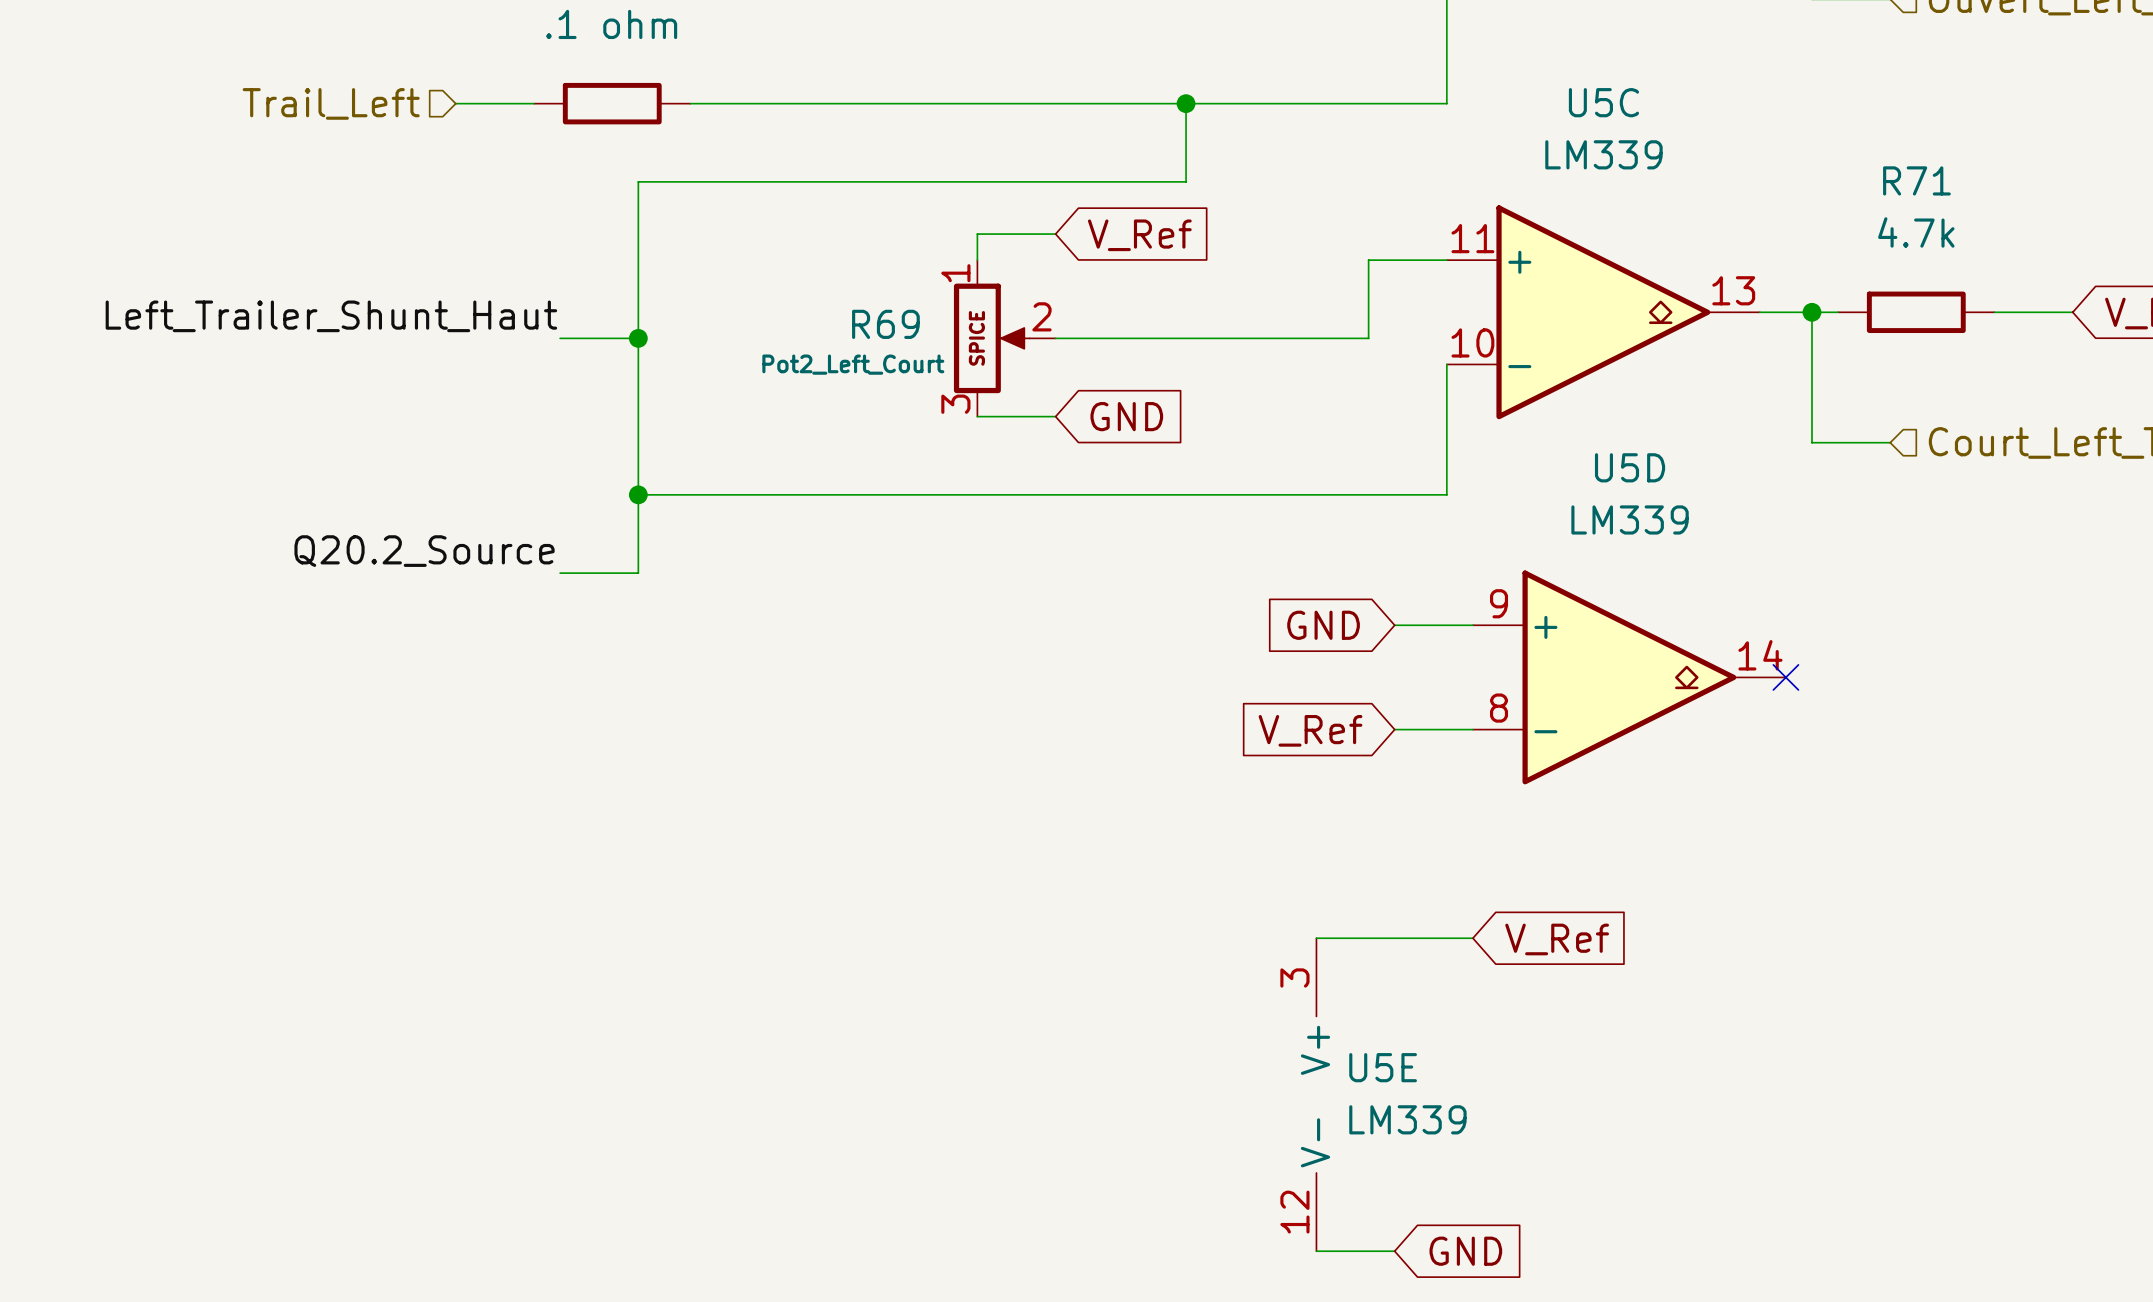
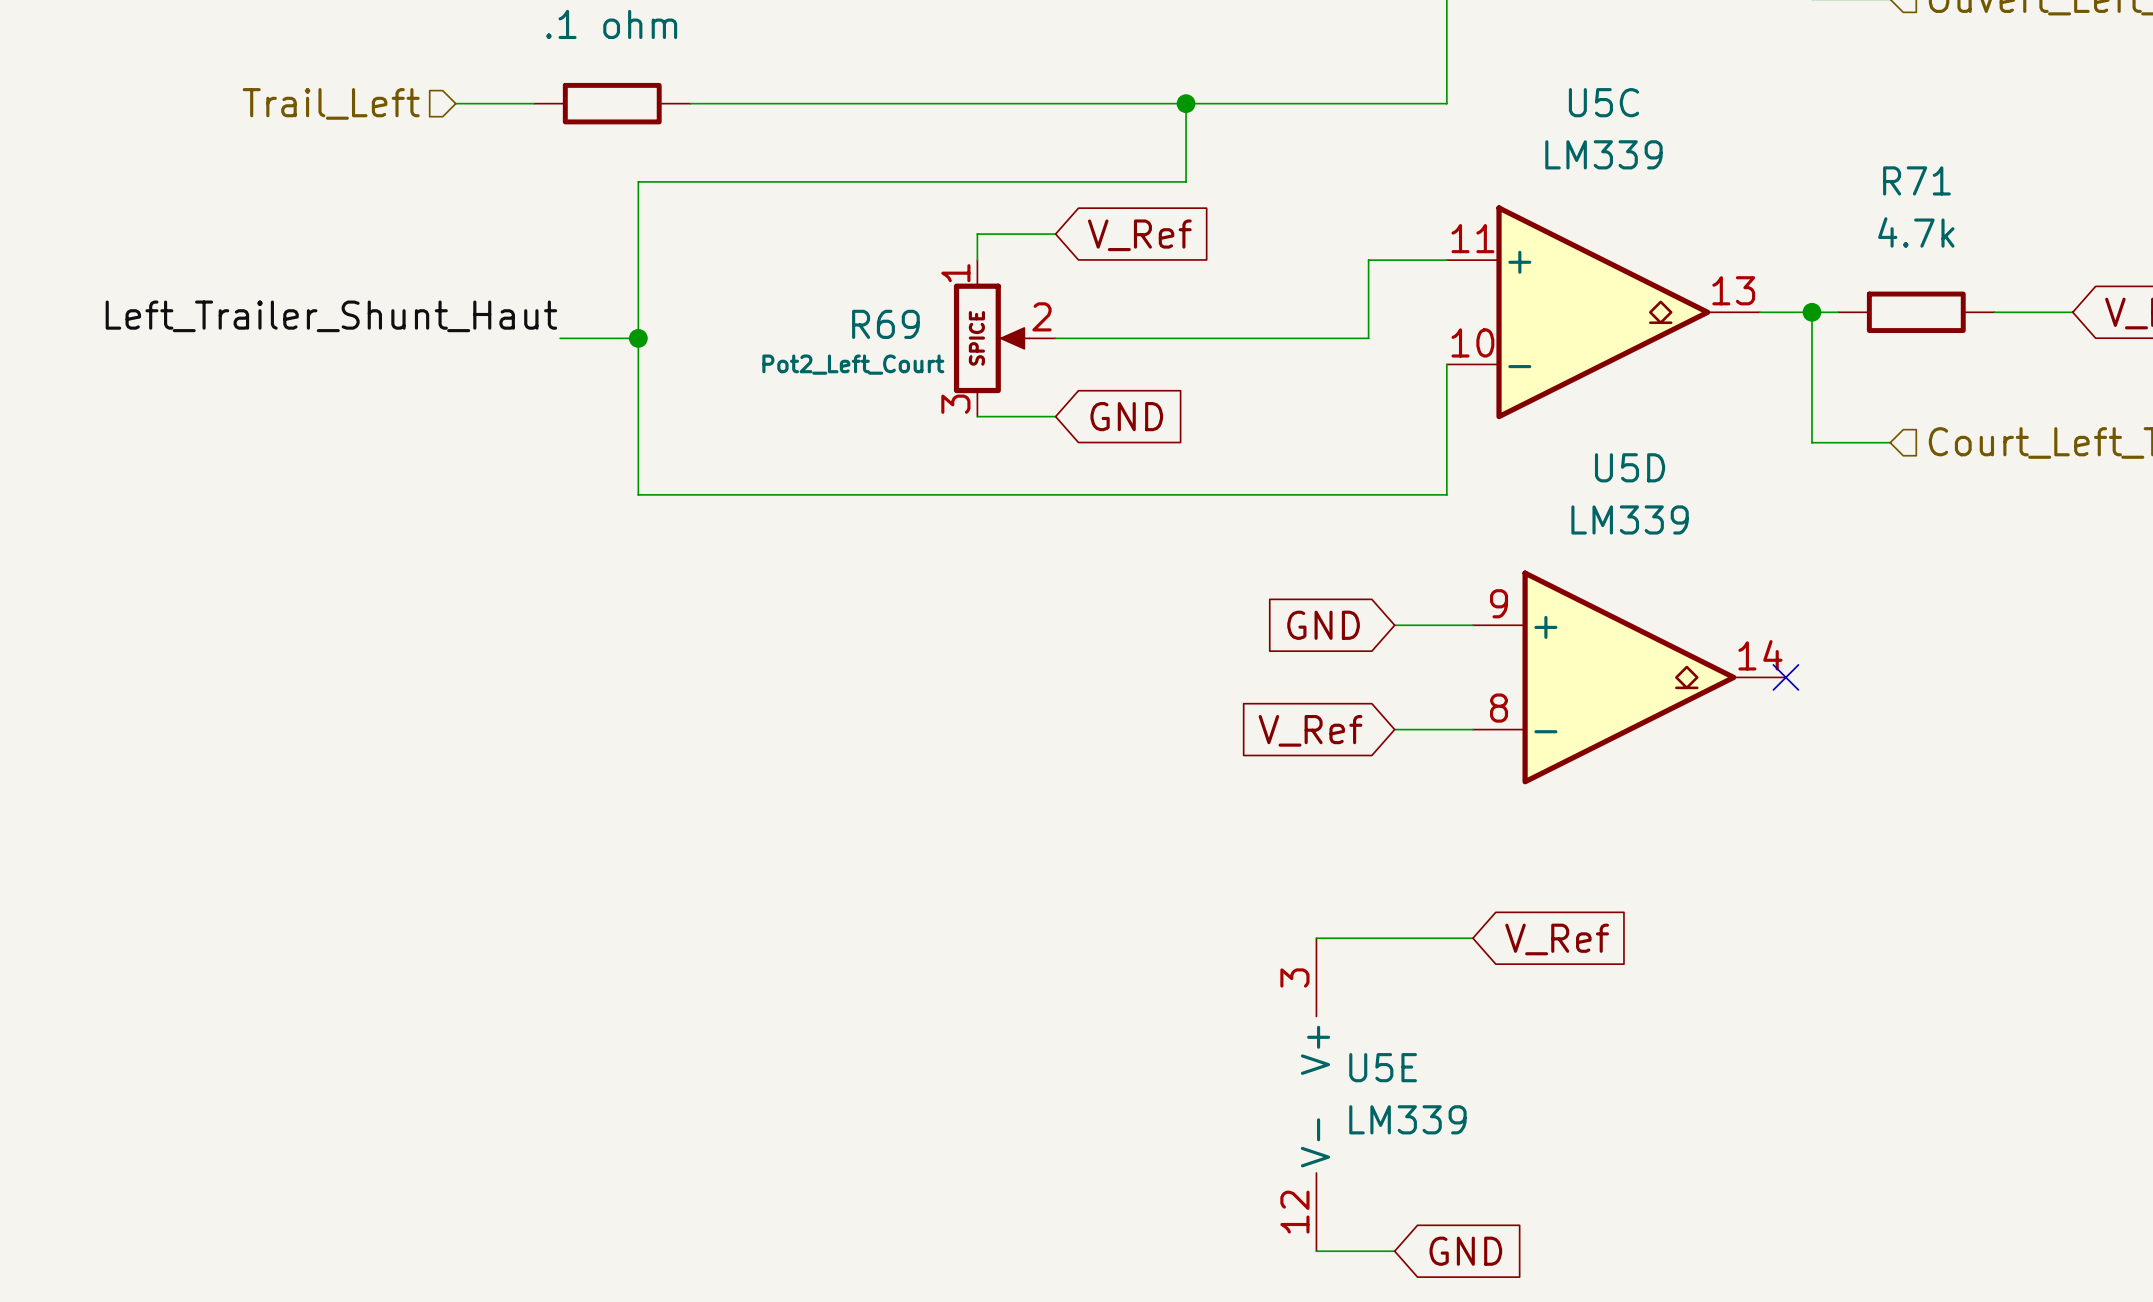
wire: (638, 494) (638, 573) (560, 573) -> none
junction: (638, 494) -> none
label: Q20.2_Source (424, 551) -> none

